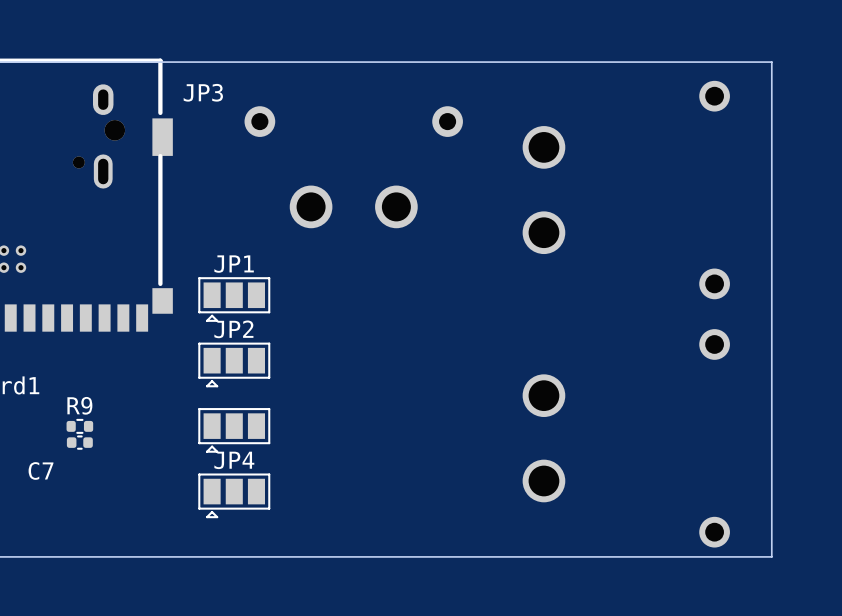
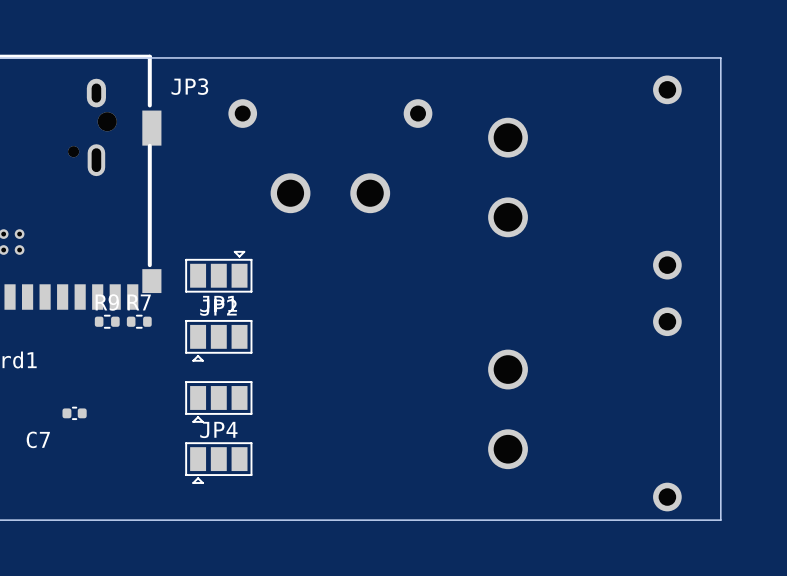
JP1 rotation: 0° (234, 299) -> 180° (218, 271)
part: none -> (139, 321)
R9 position: (79, 426) -> (107, 321)

